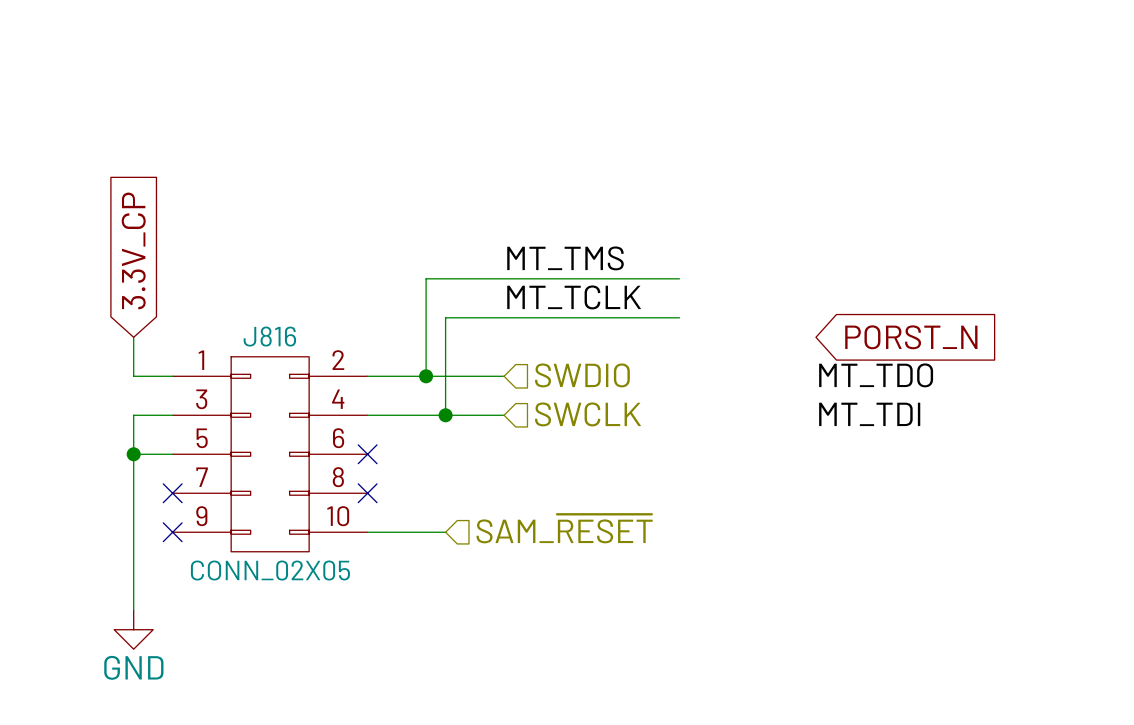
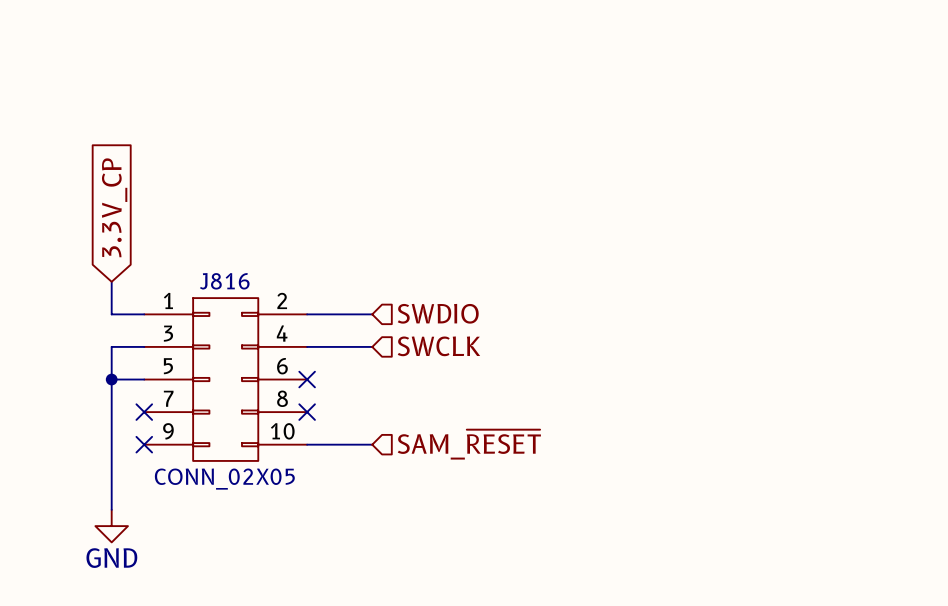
label: MT_TMS (565, 258) -> none
wire: (679, 278) (426, 278) (426, 376) -> none
label: MT_TCLK (574, 297) -> none
wire: (679, 317) (445, 317) (445, 415) (504, 415) -> none
global label: PORST_N (911, 337) -> none
hierarchical label position: SWDIO (582, 375) -> SWDIO (438, 313)
label: MT_TDO (876, 375) -> none
junction: (426, 376) -> none
wire: (445, 376) (504, 376) -> none
hierarchical label position: SWCLK (588, 414) -> SWCLK (438, 346)
label: MT_TDI (869, 414) -> none
junction: (445, 415) -> none

